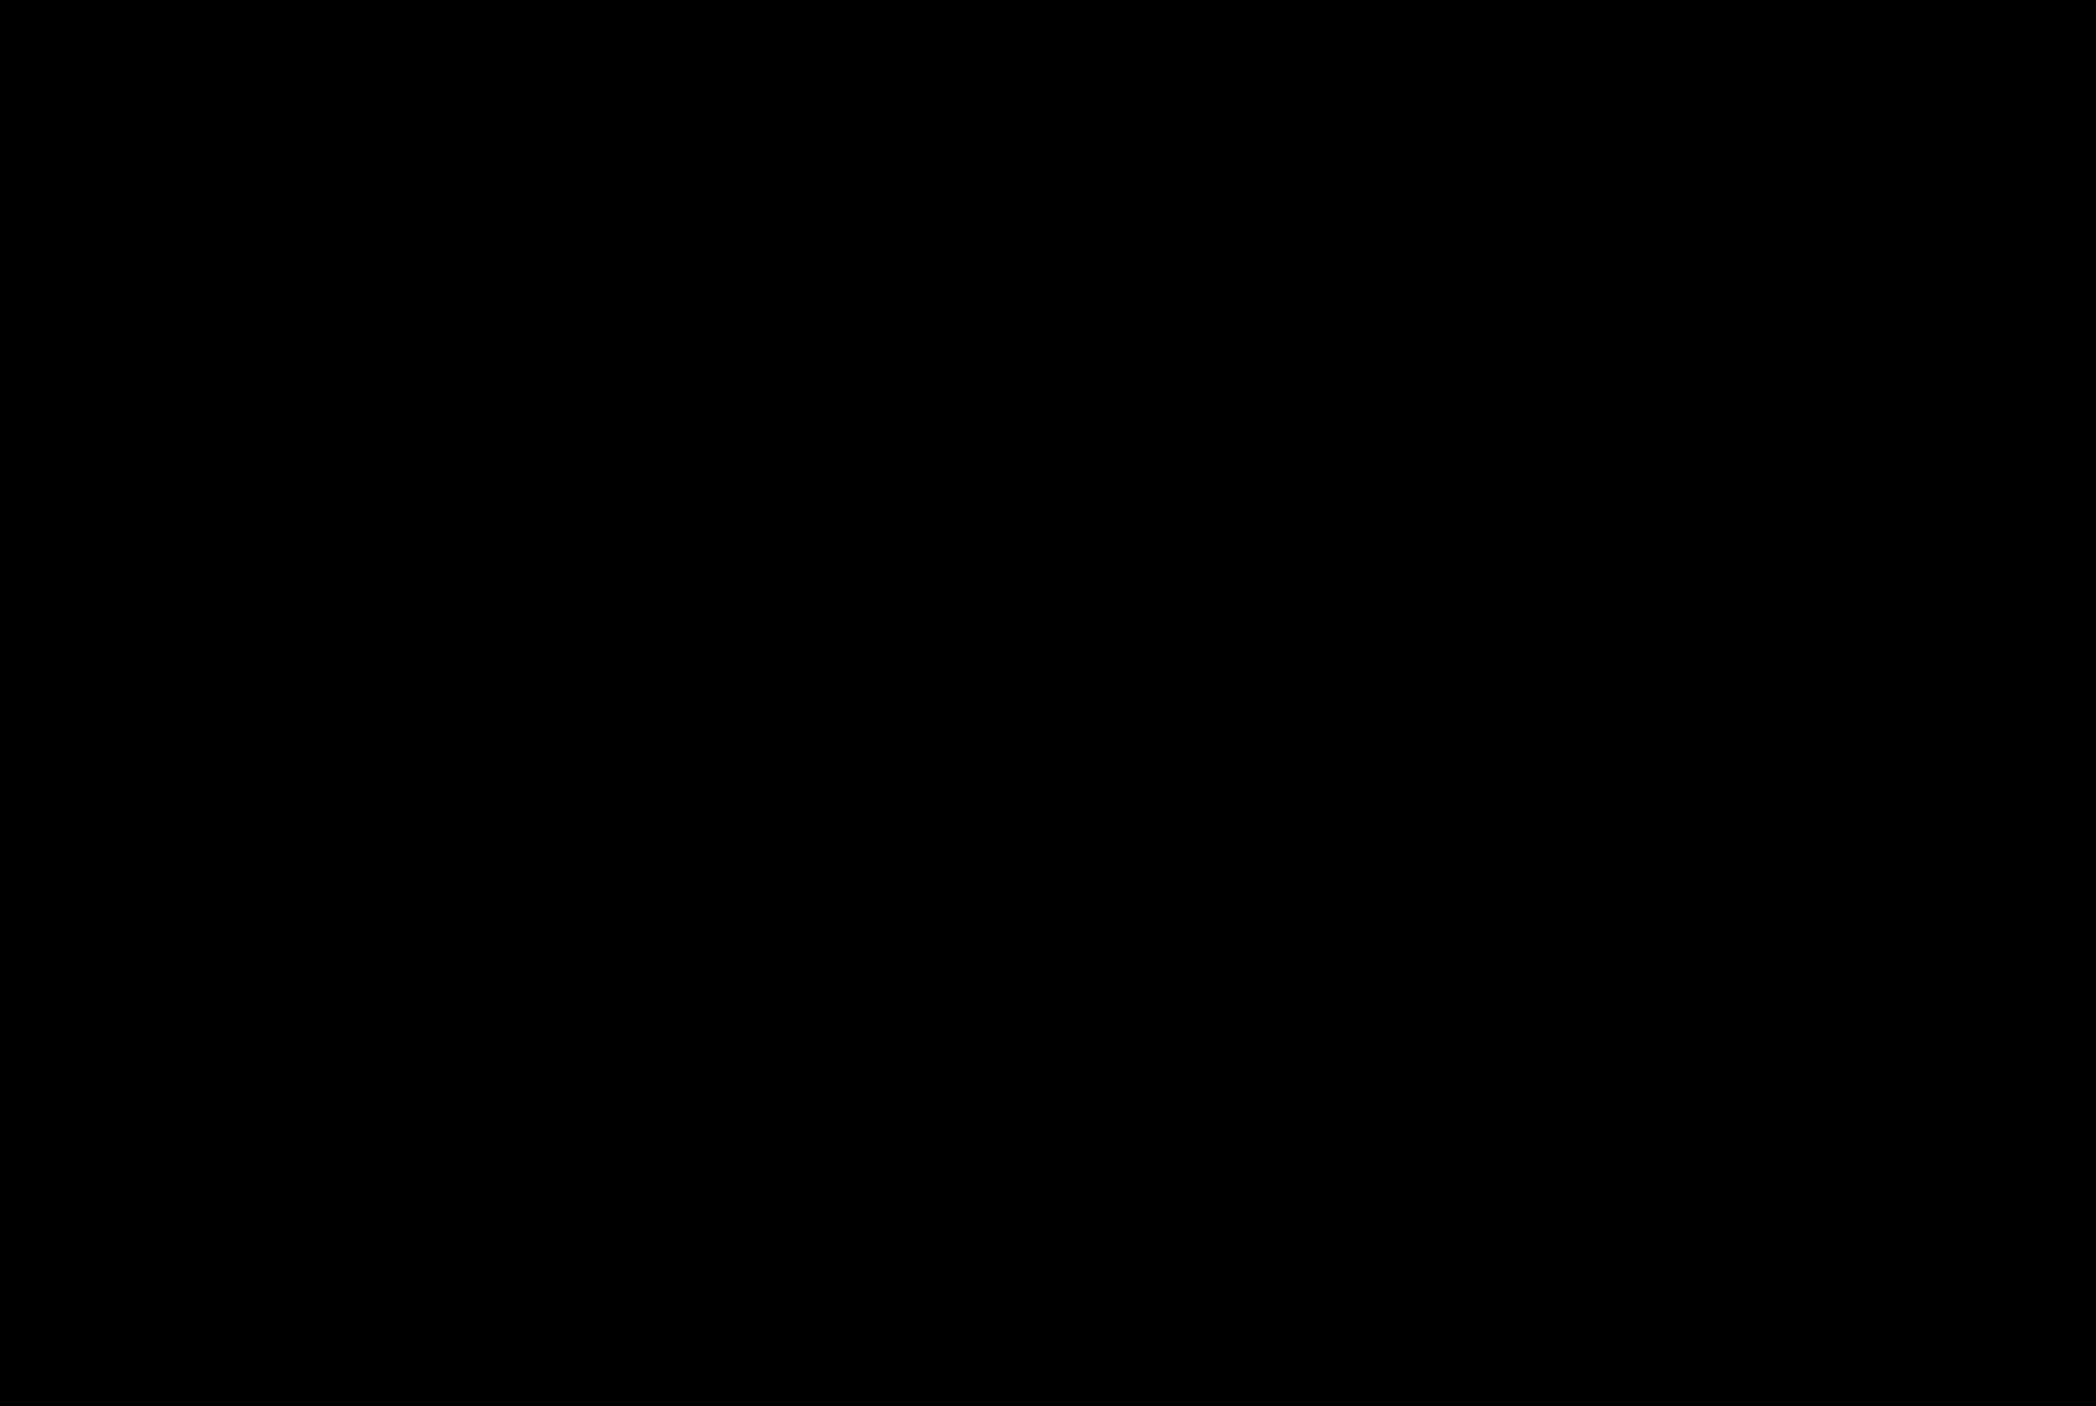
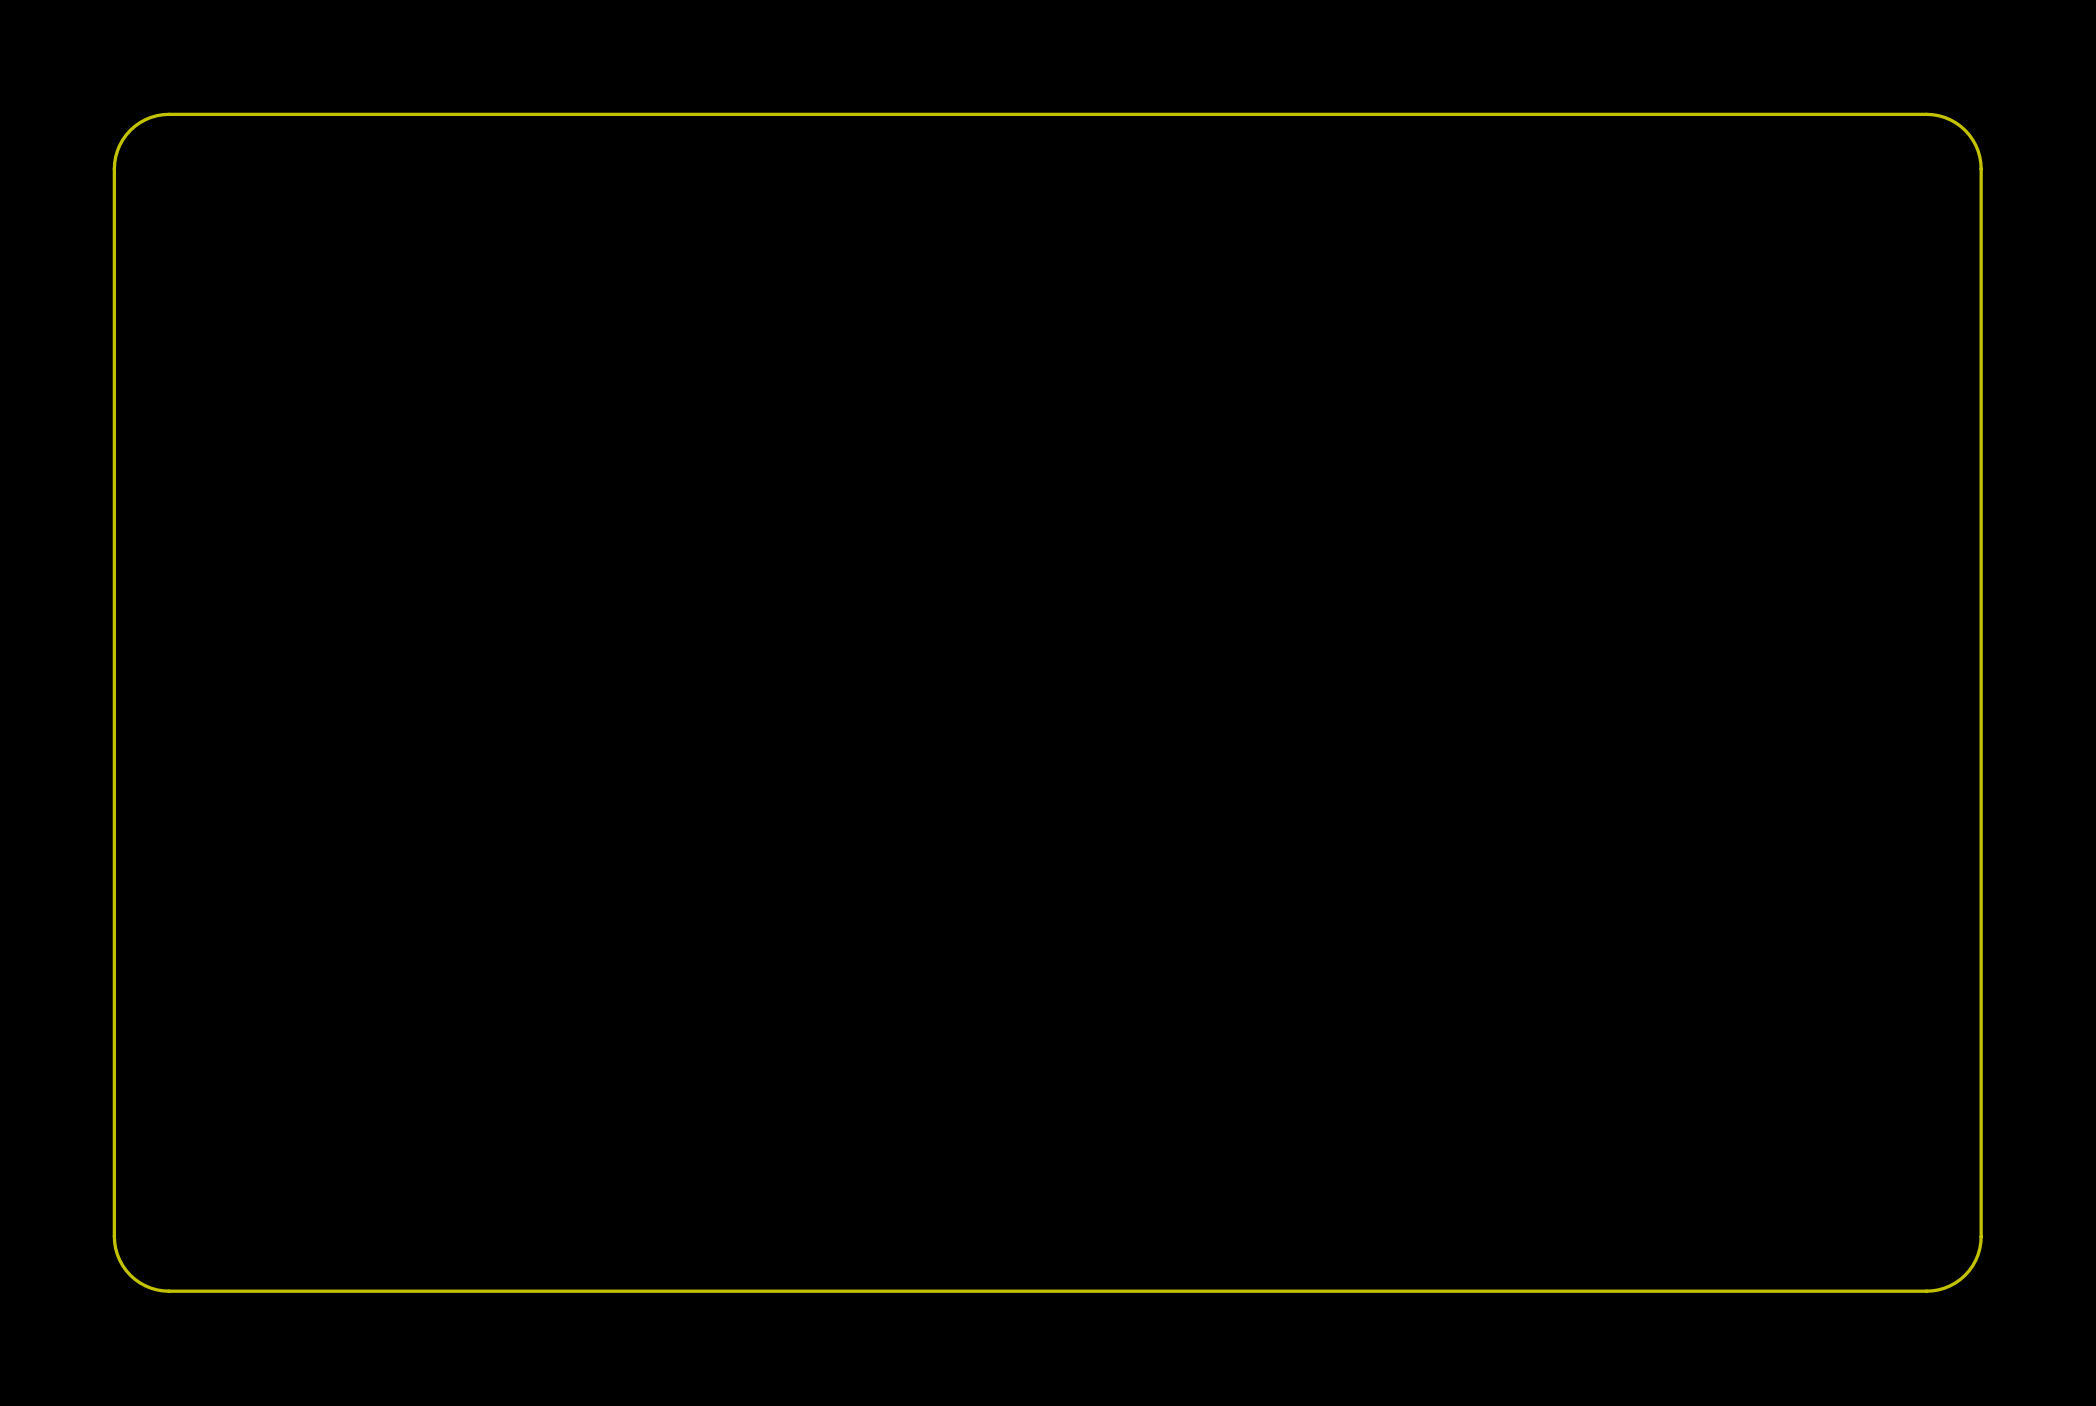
board edge: none -> (168, 114) (1926, 114) (1944, 117) (1955, 122) (1972, 139) (1978, 150) (1981, 168) (1981, 1236) (1979, 1248) (1972, 1265) (1955, 1282) (1944, 1288) (1926, 1291) (168, 1291) (150, 1288) (139, 1282) (122, 1265) (117, 1254) (114, 1236) (114, 168) (119, 145) (130, 130) (145, 119) (168, 114)

